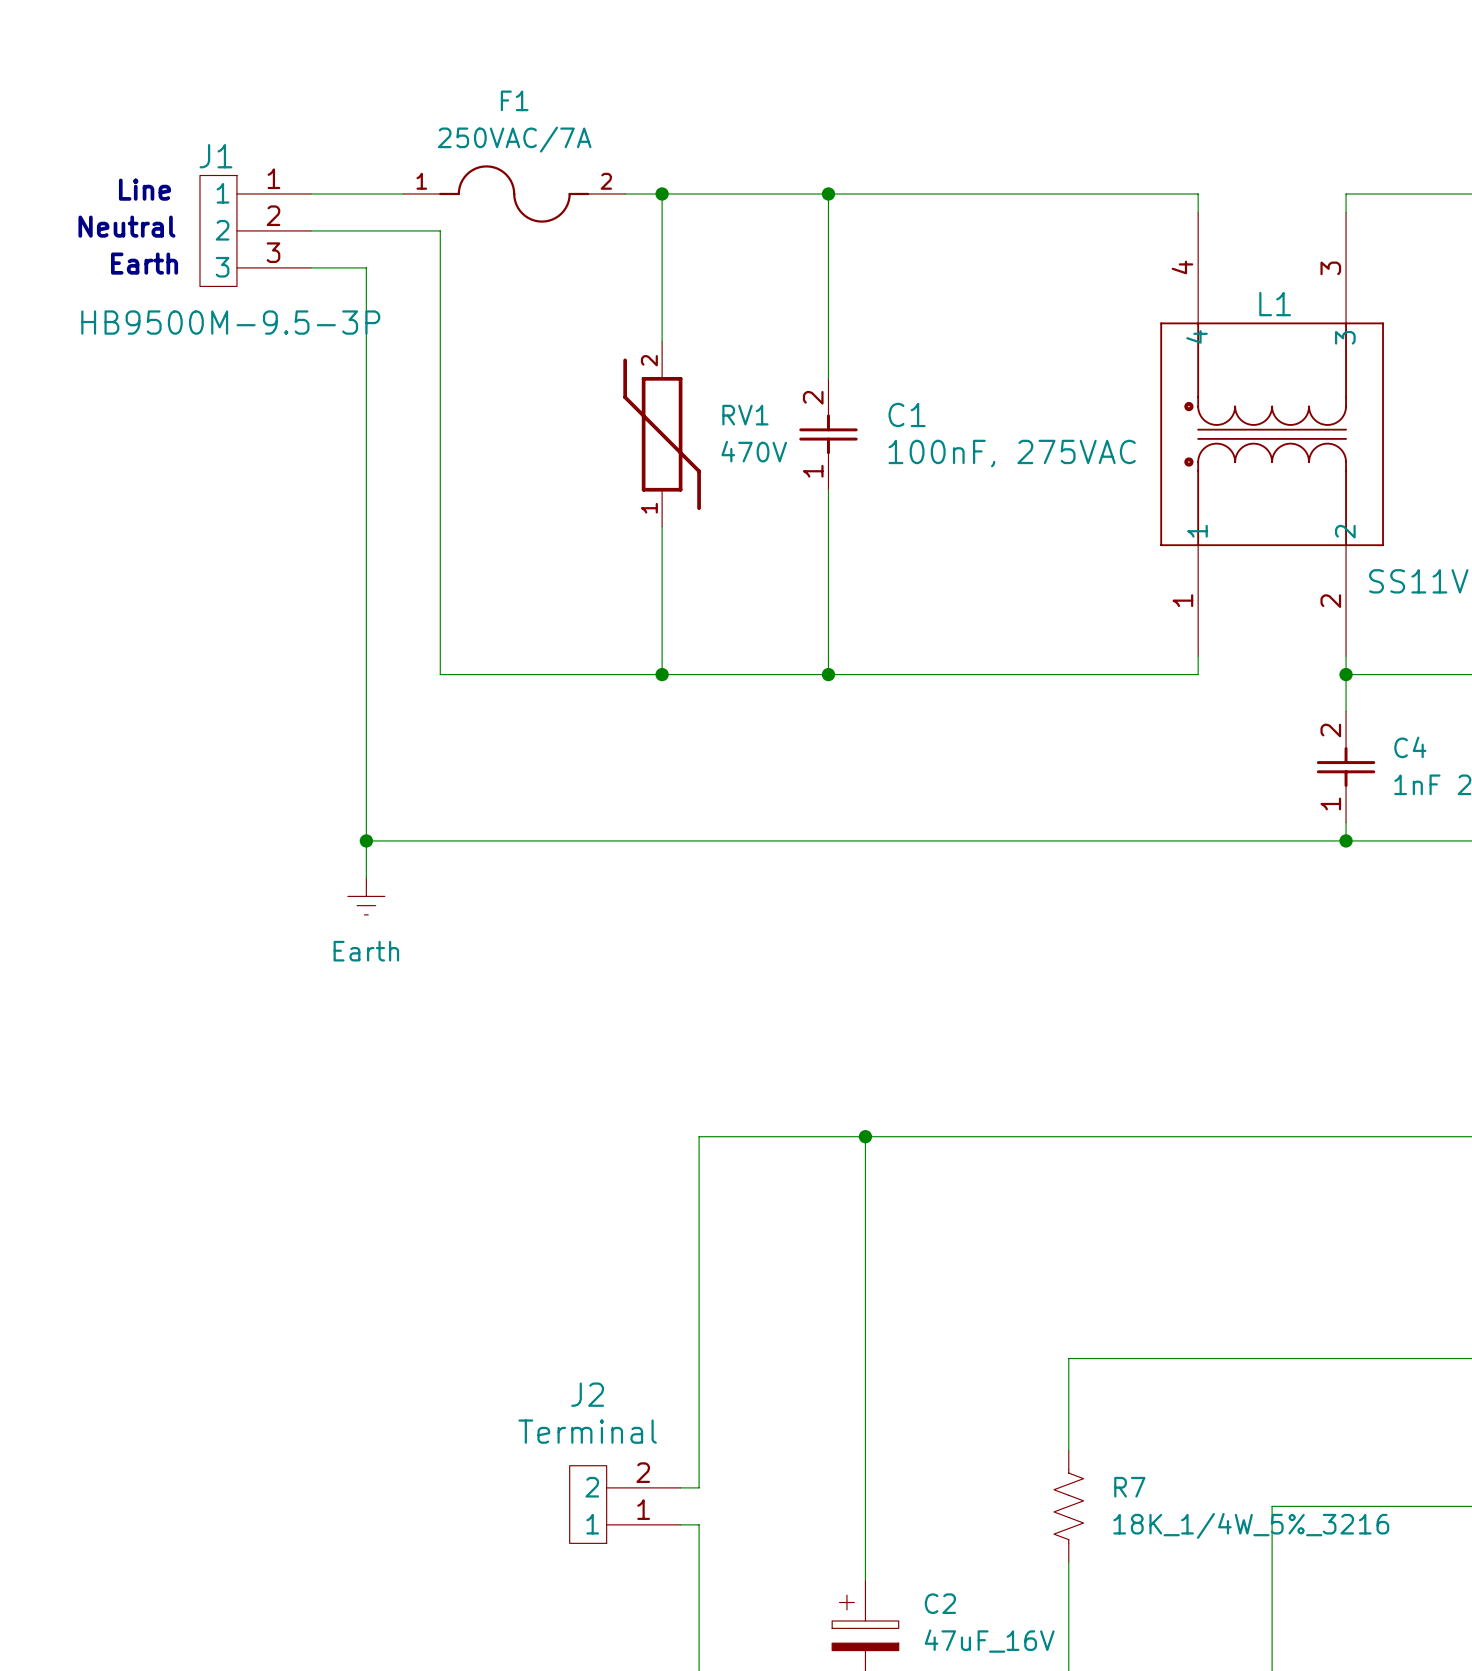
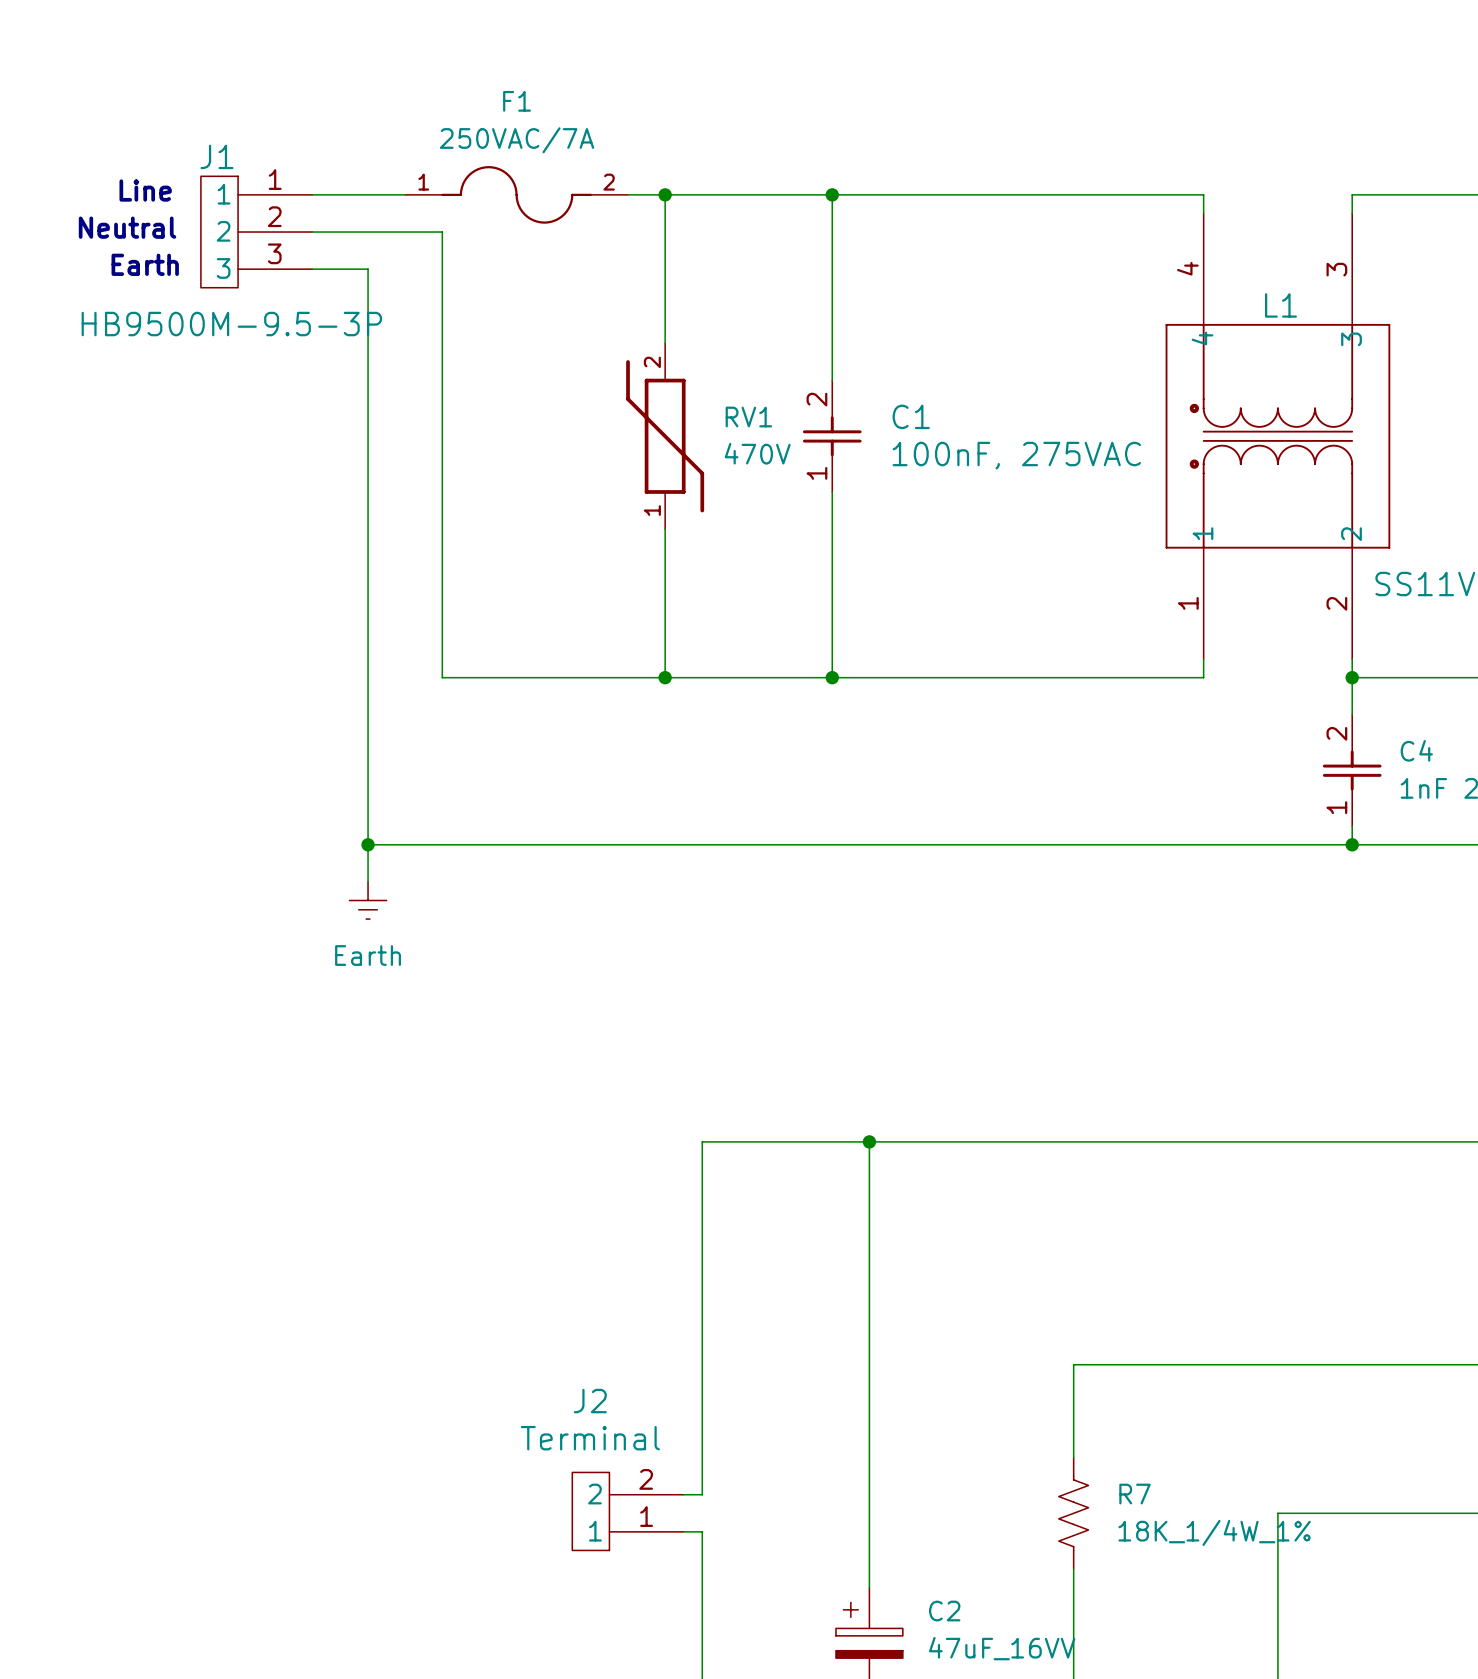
R7 value: 18K_1/4W_5%_3216 (1251, 1525) -> 18K_1/4W_1% (1214, 1532)
C2 value: 47uF_16V (989, 1641) -> 47uF_16VV (1002, 1648)

